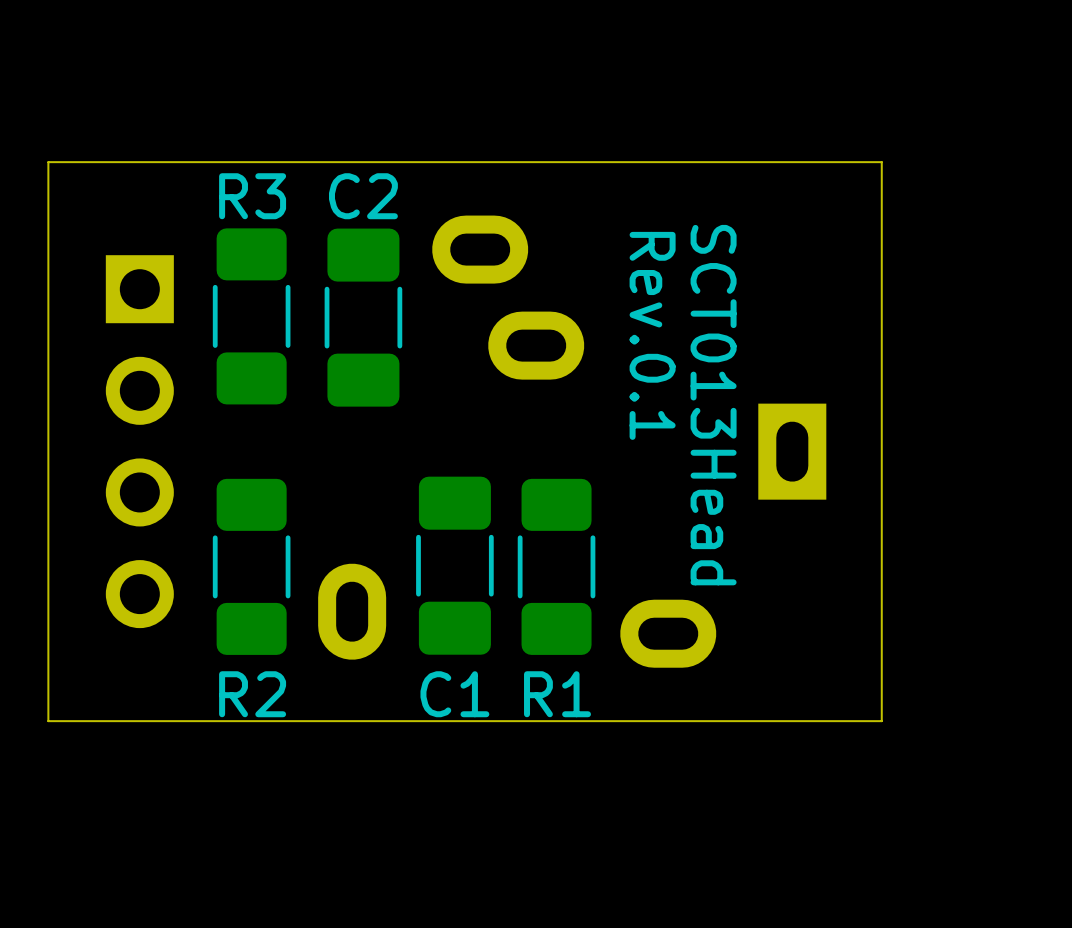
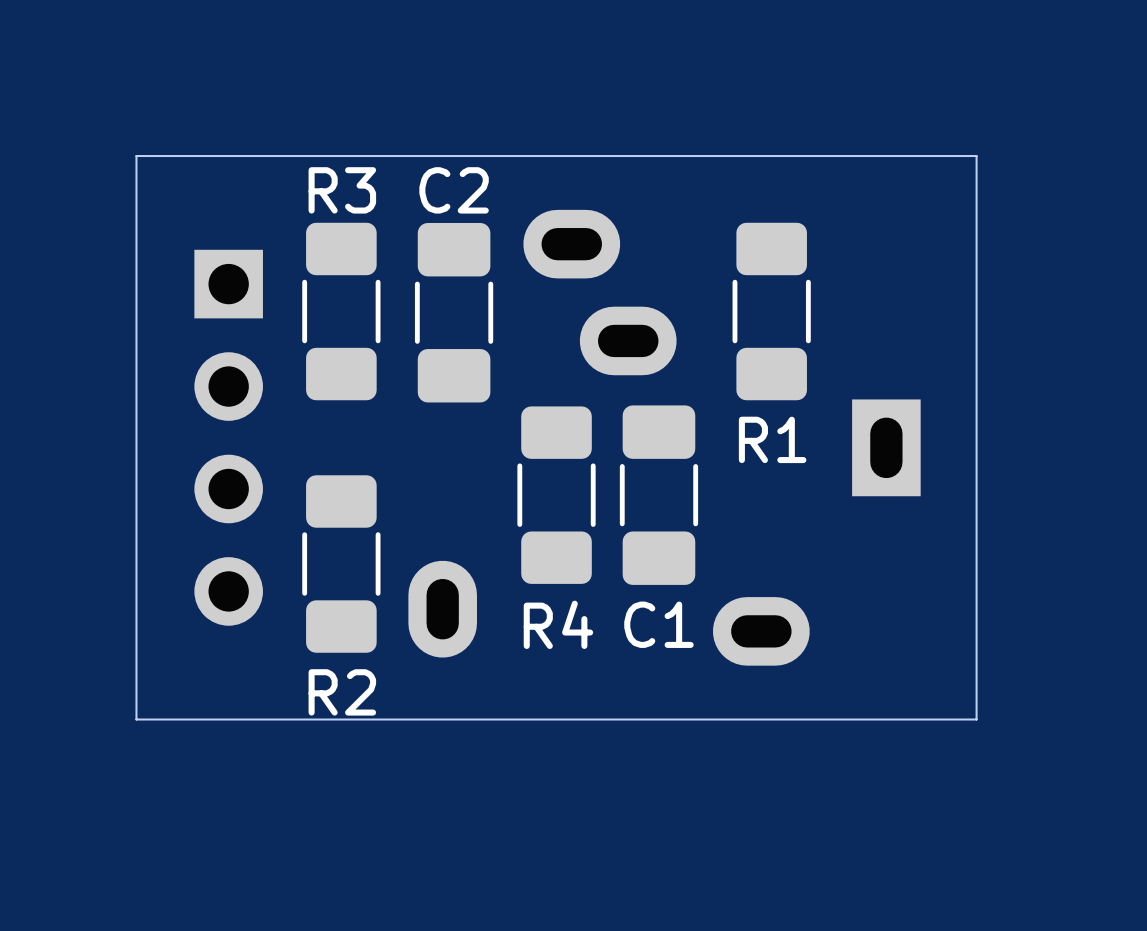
text: Rev.0.1 (652, 335) -> none
text: SCT013Head (713, 405) -> none
R4: none -> (556, 495)
C1 position: (454, 565) -> (658, 495)
R1 position: (556, 566) -> (771, 311)

